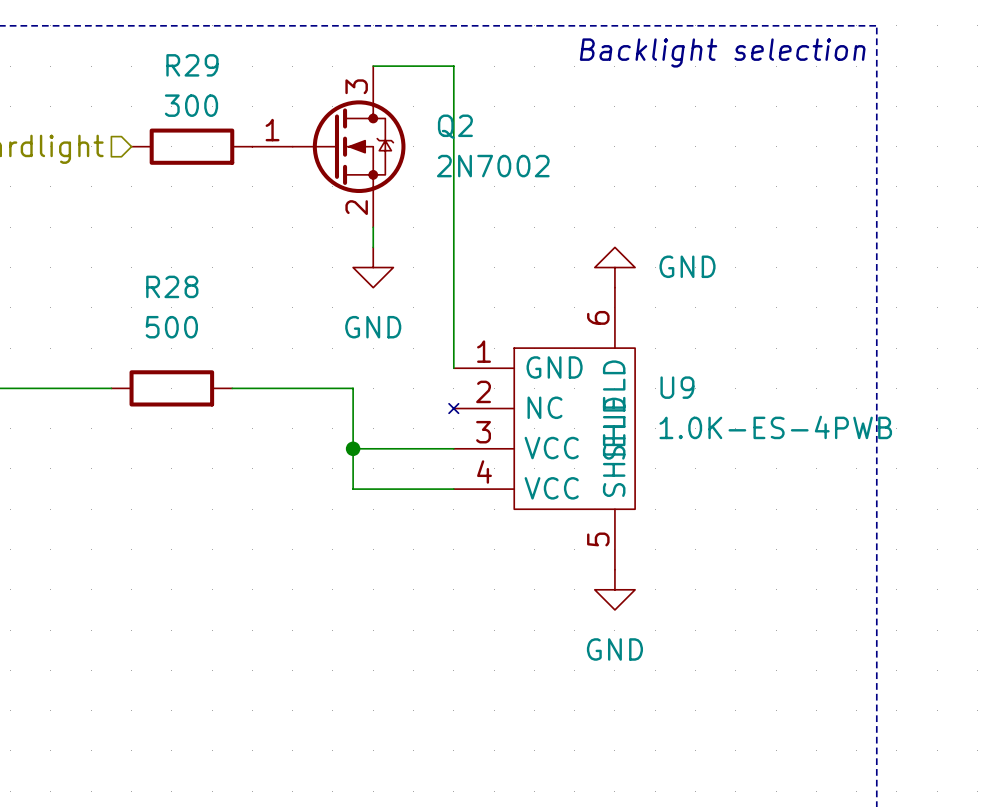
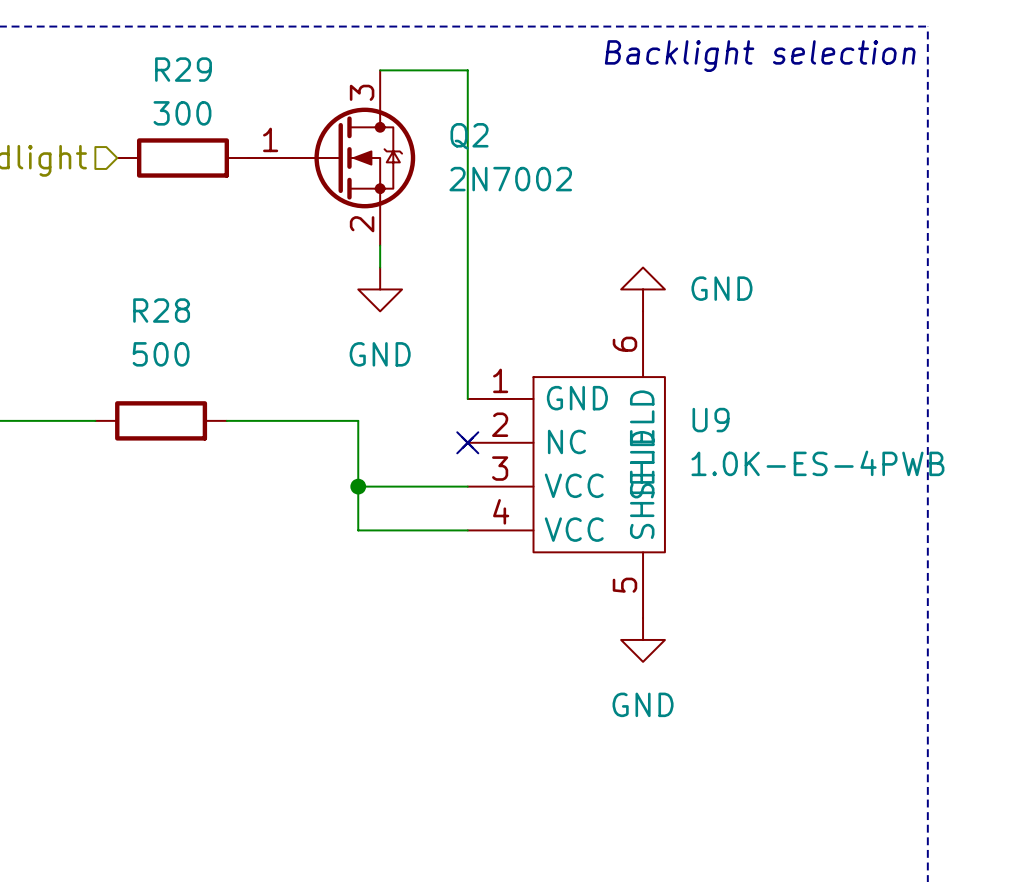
no-connect mark: none -> (467, 442)

